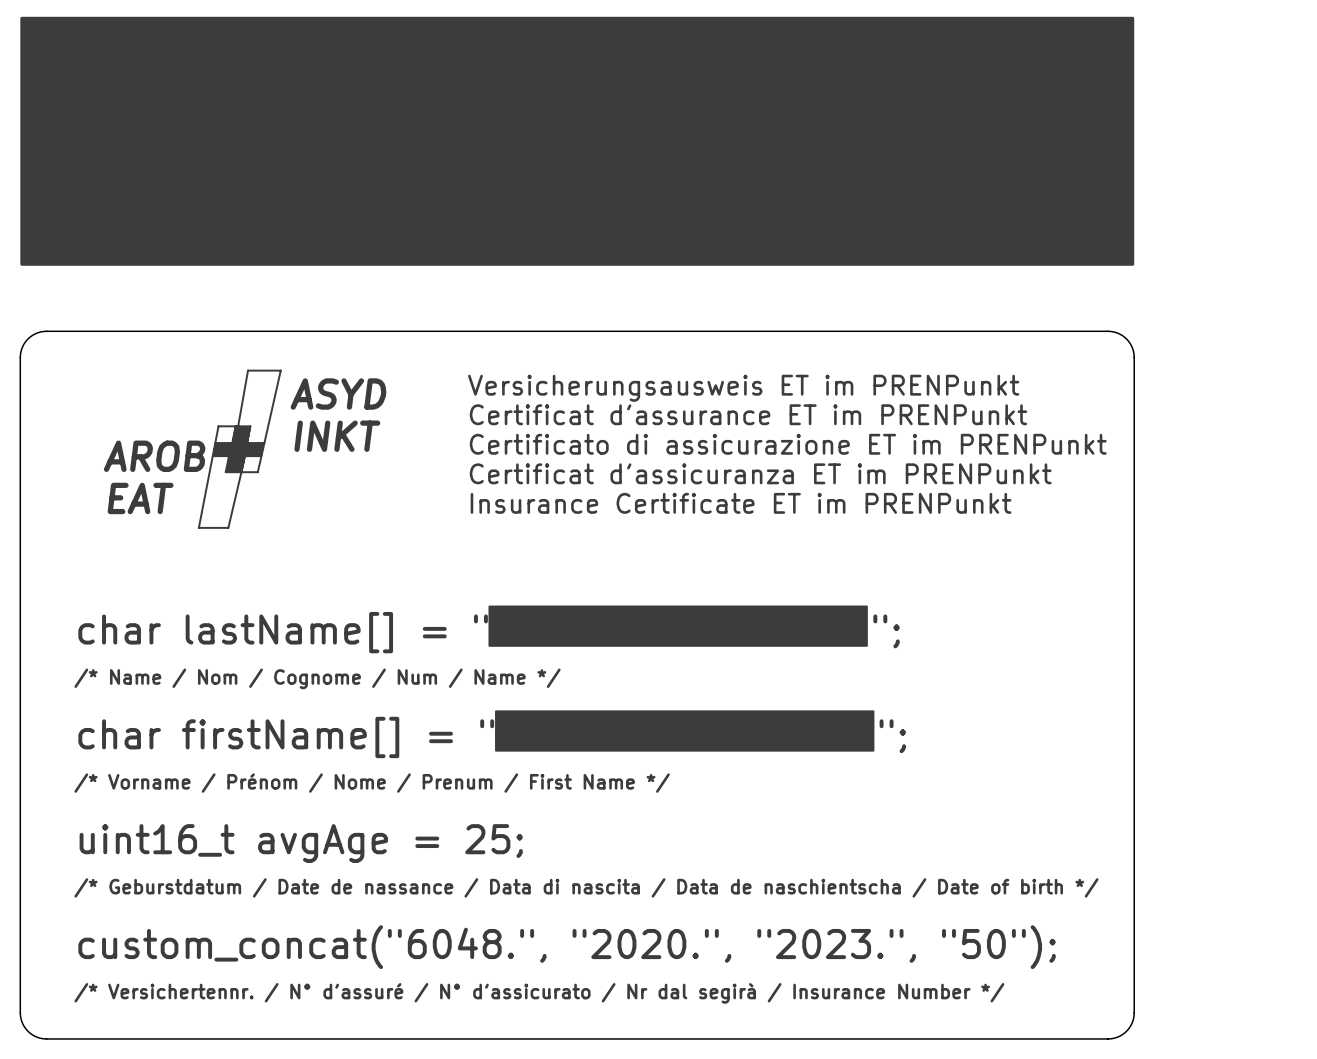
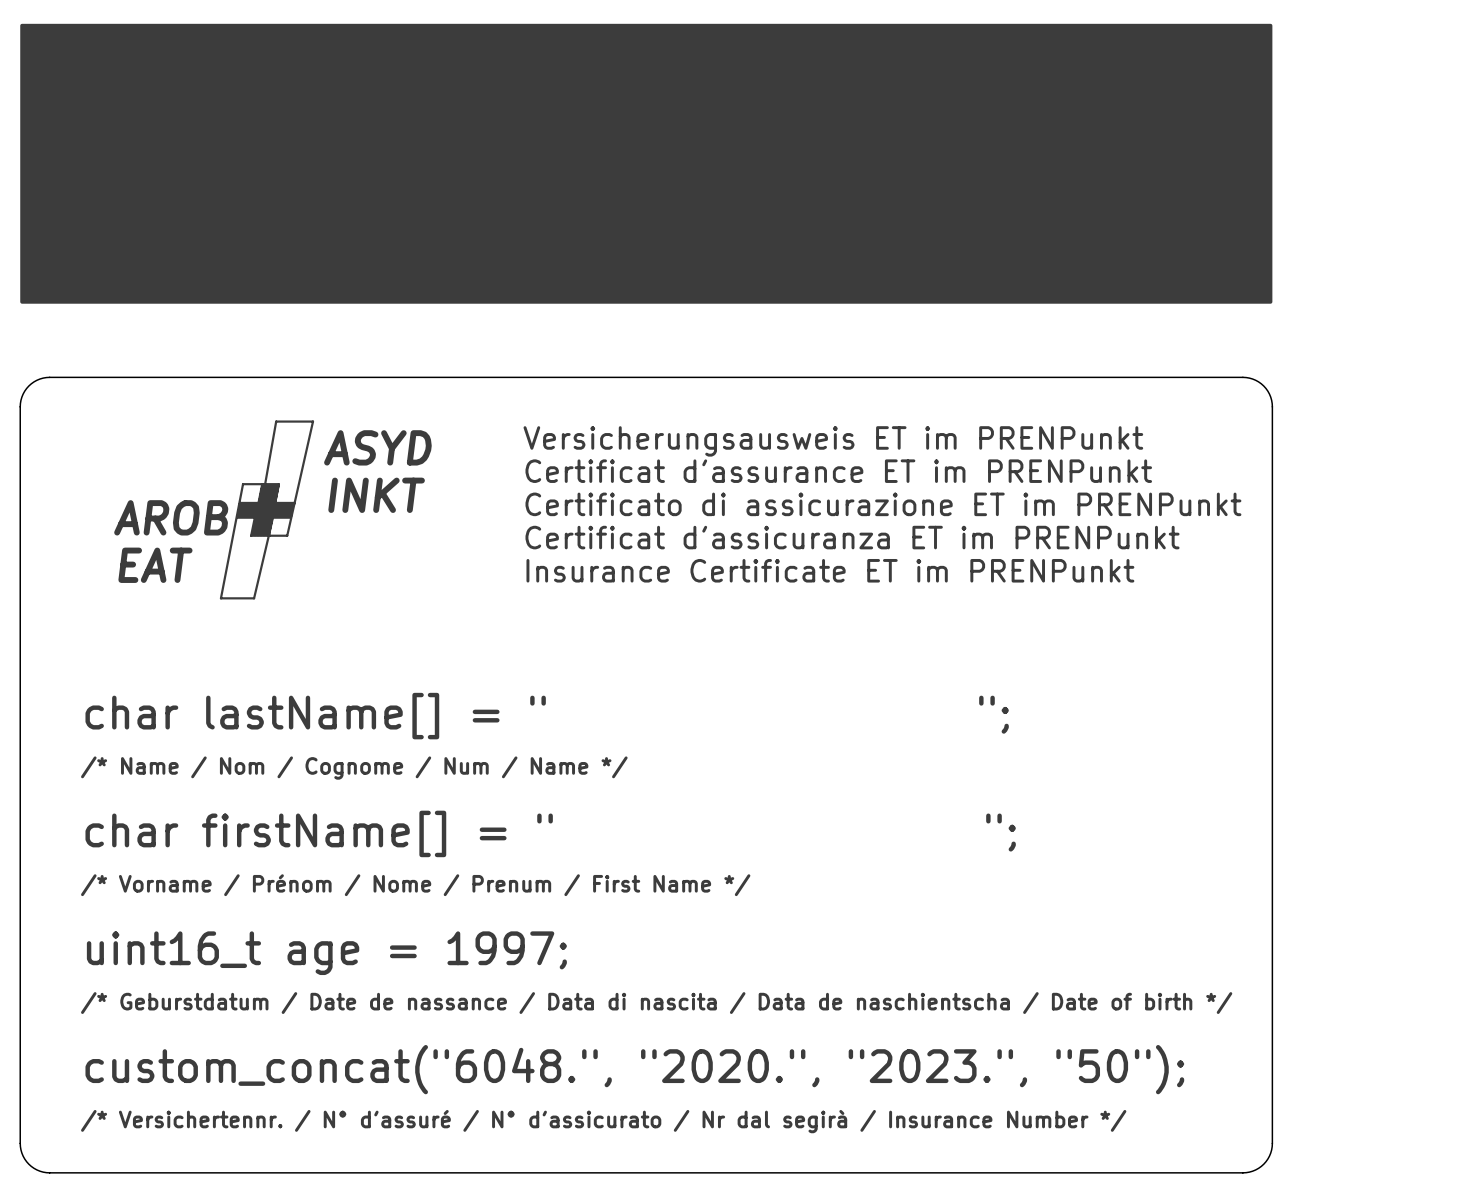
drawing: [488, 605, 868, 647] -> none
drawing: [495, 710, 875, 752] -> none
text: uint16_t avgAge = 25; (301, 843) -> uint16_t age = 1997; (326, 953)

